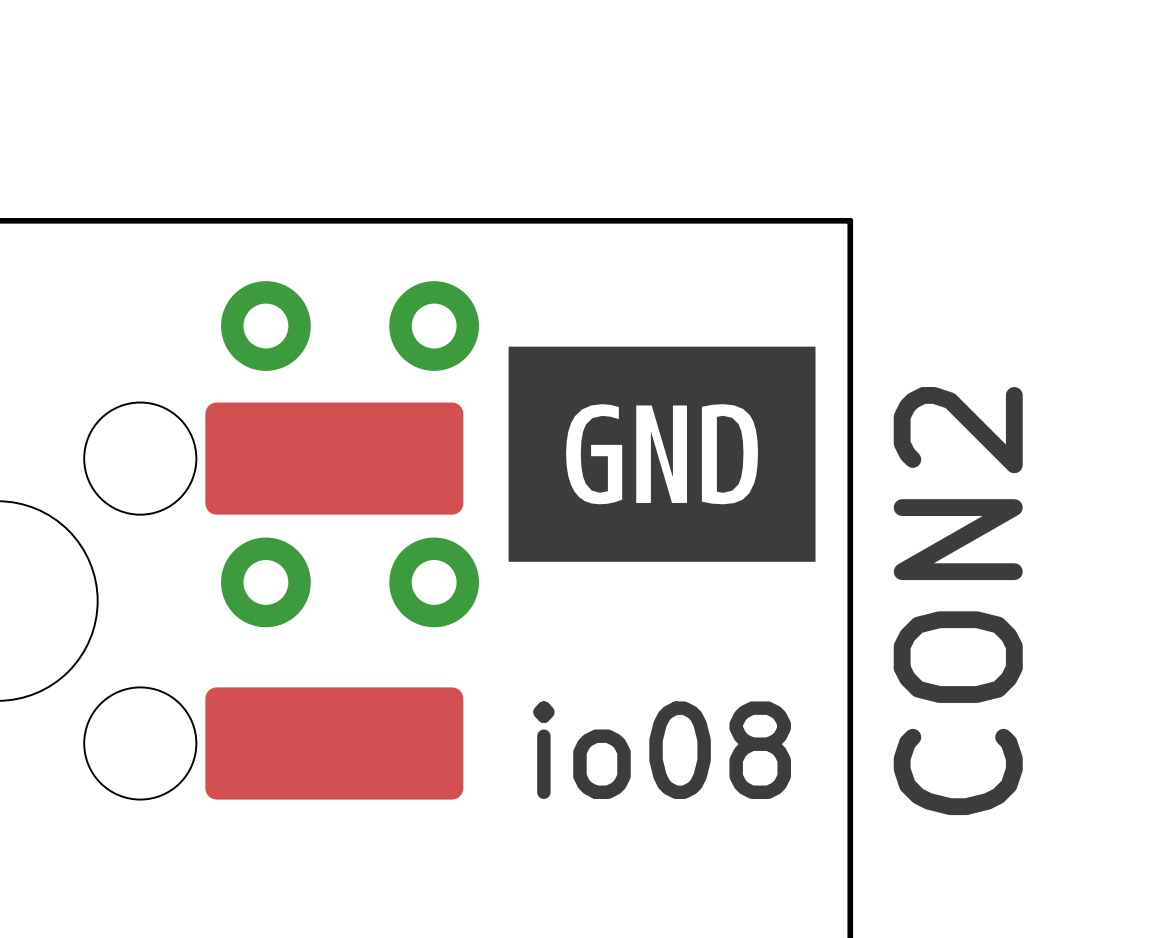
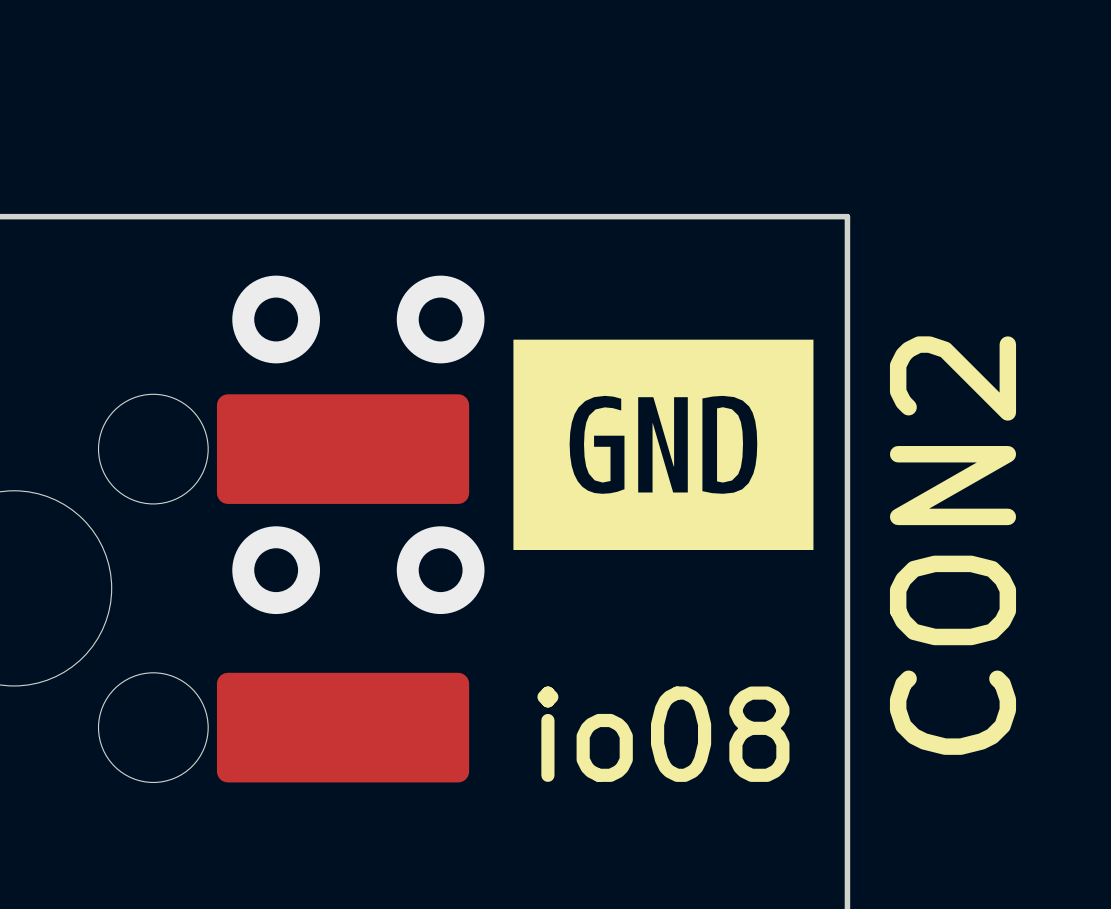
CON2 name position: CON2 (958, 601) -> CON2 (953, 545)

